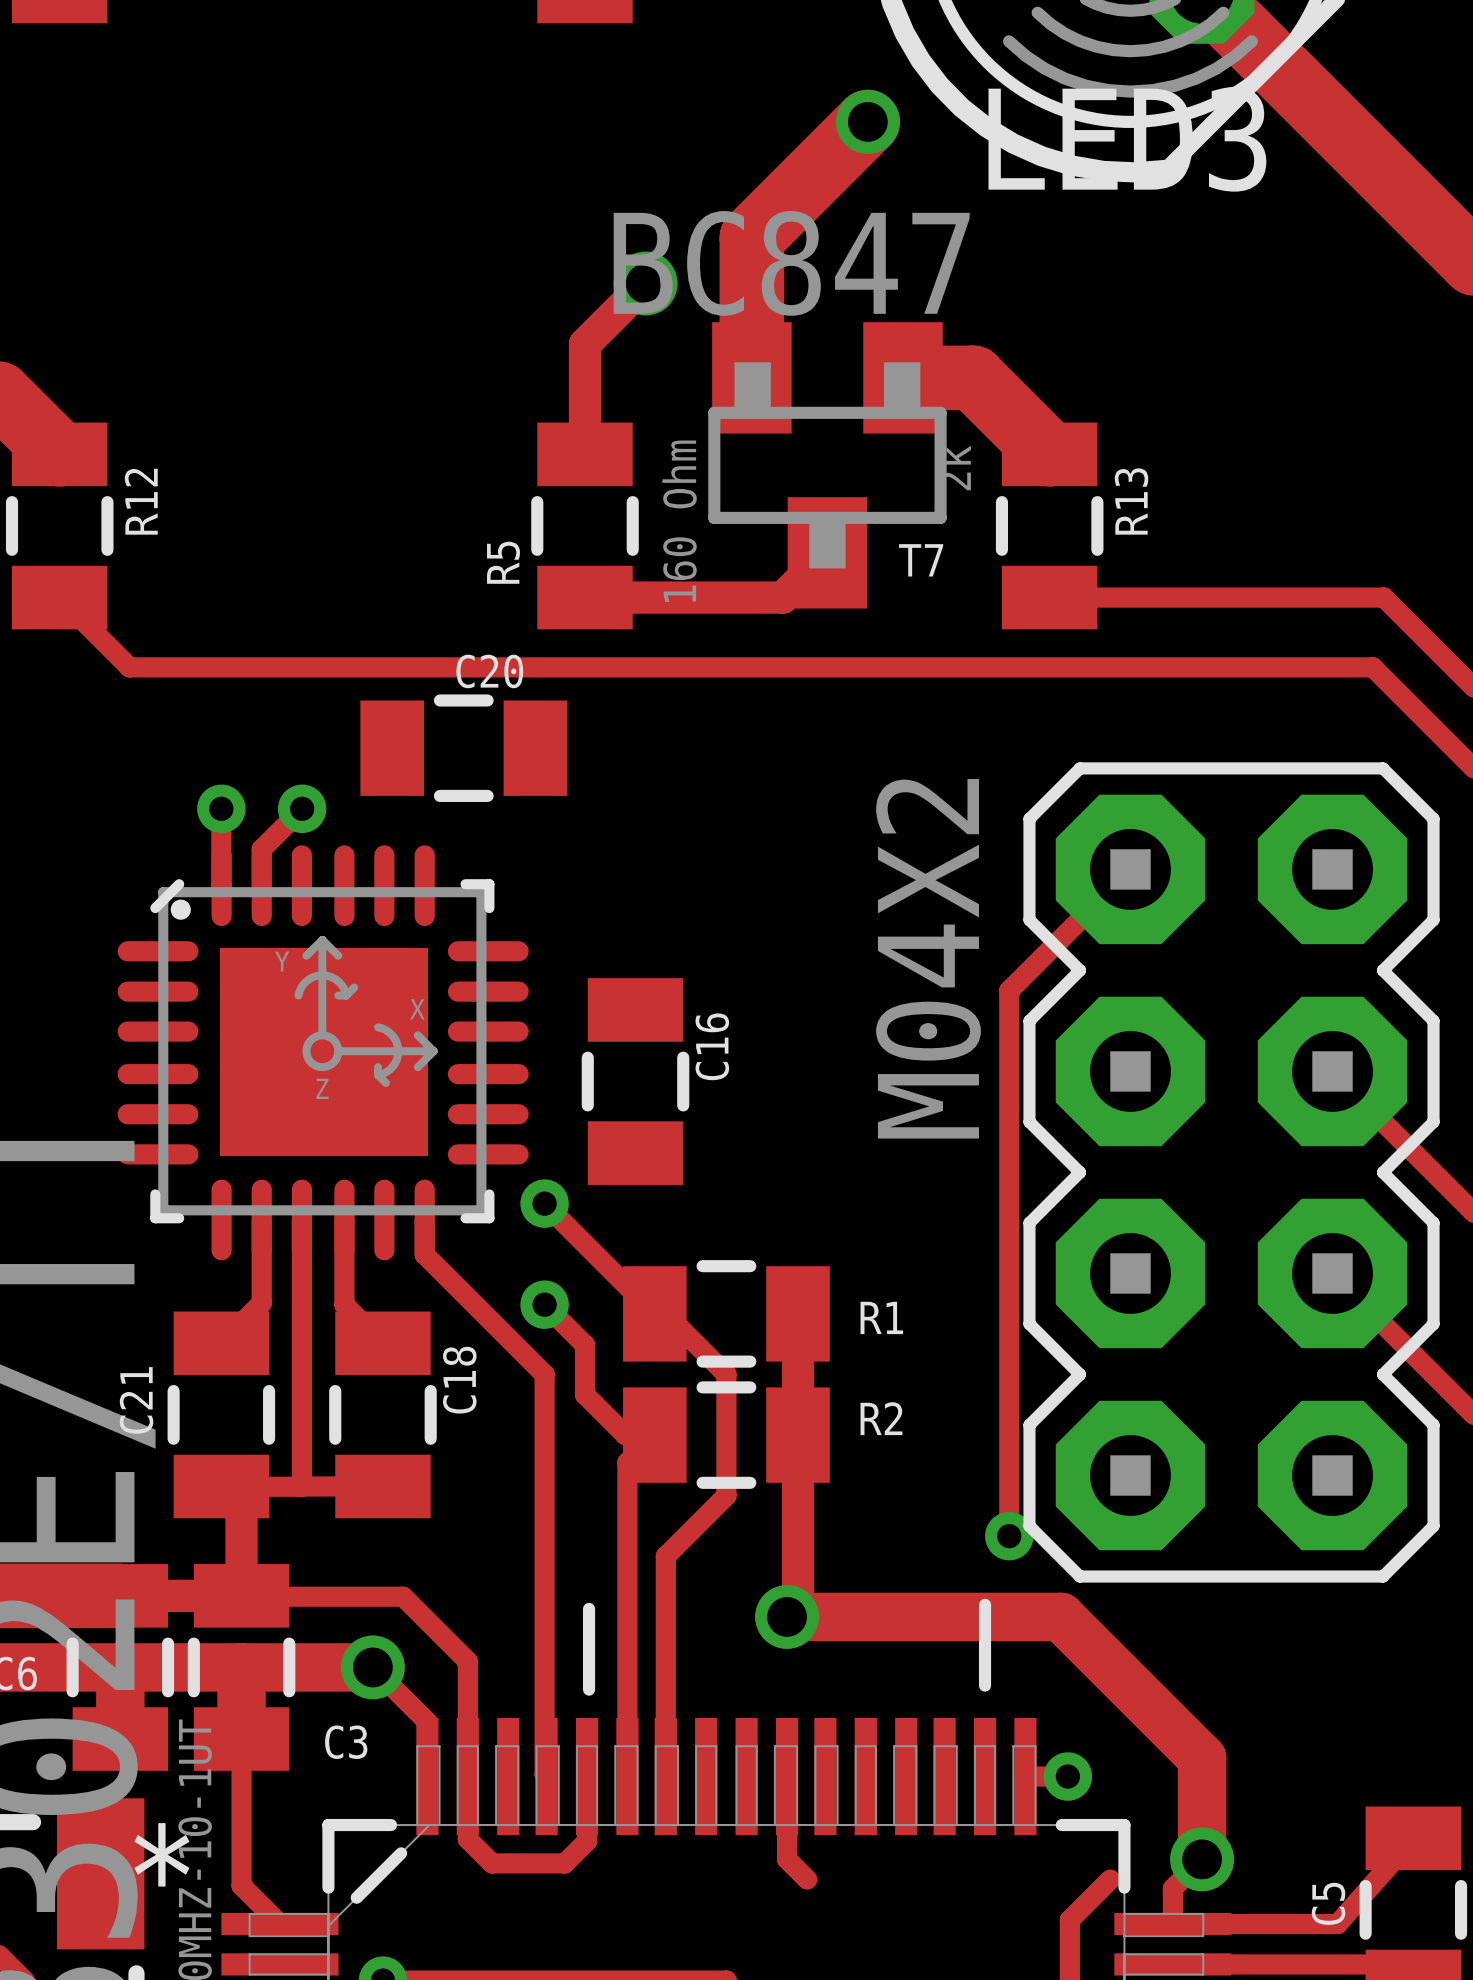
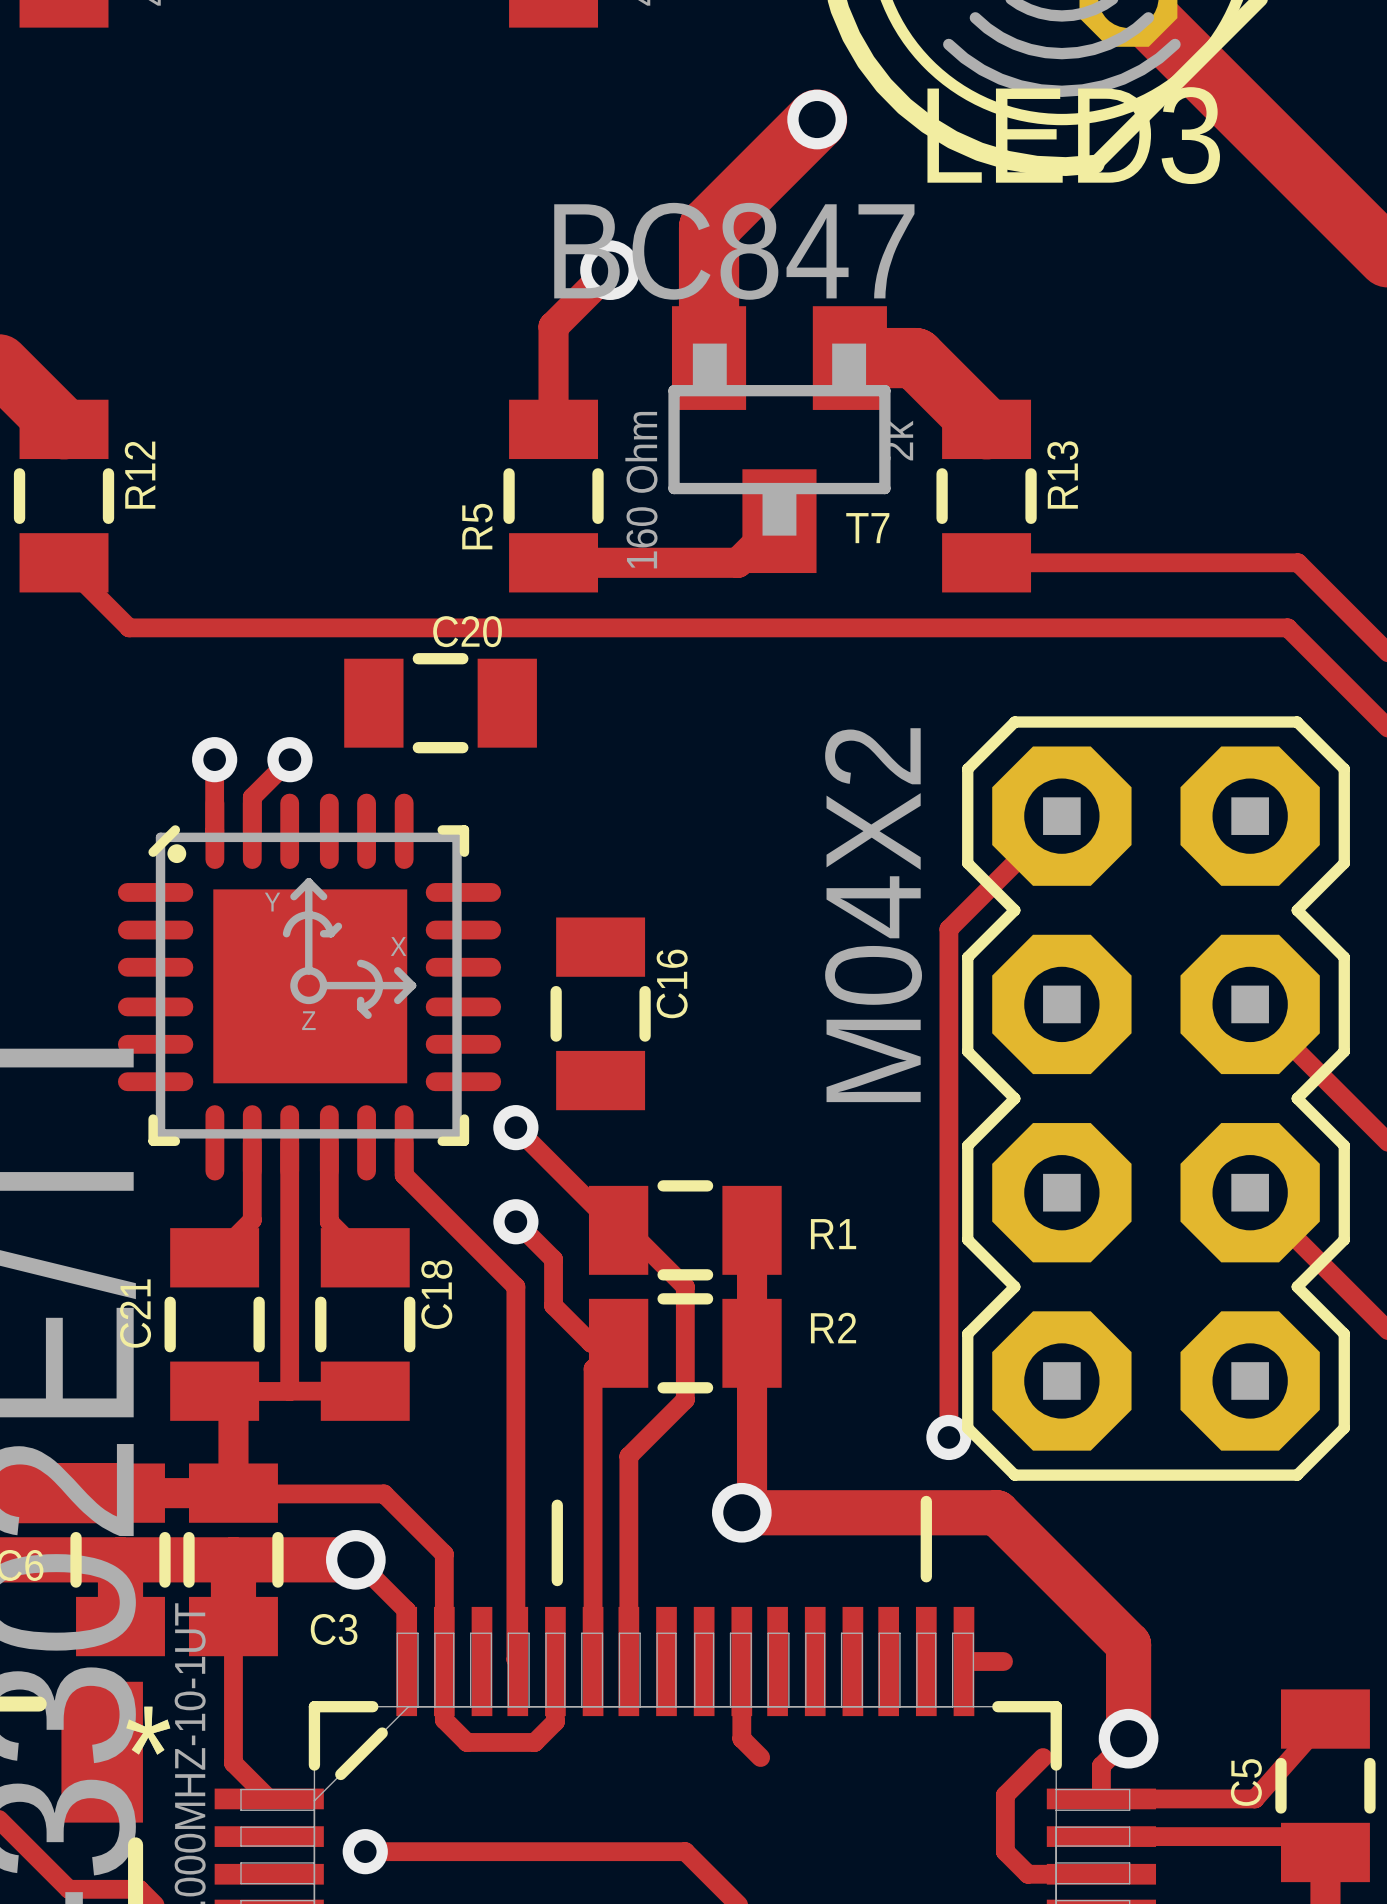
via: (1067, 1776) -> none

